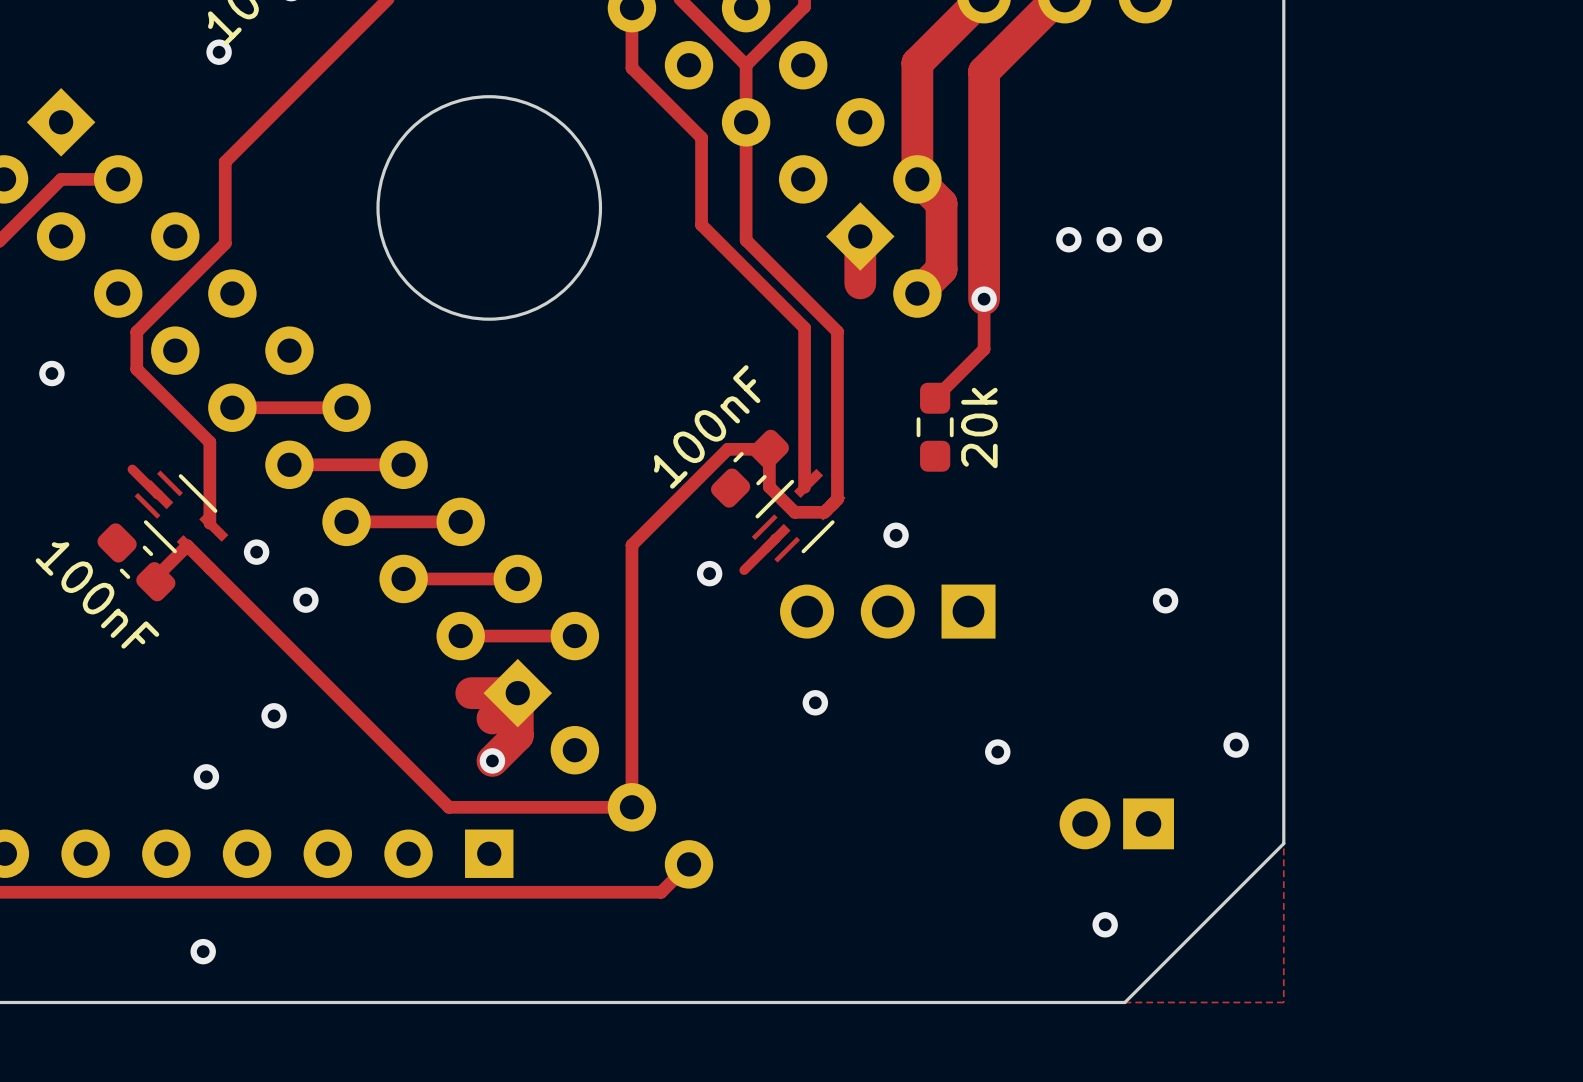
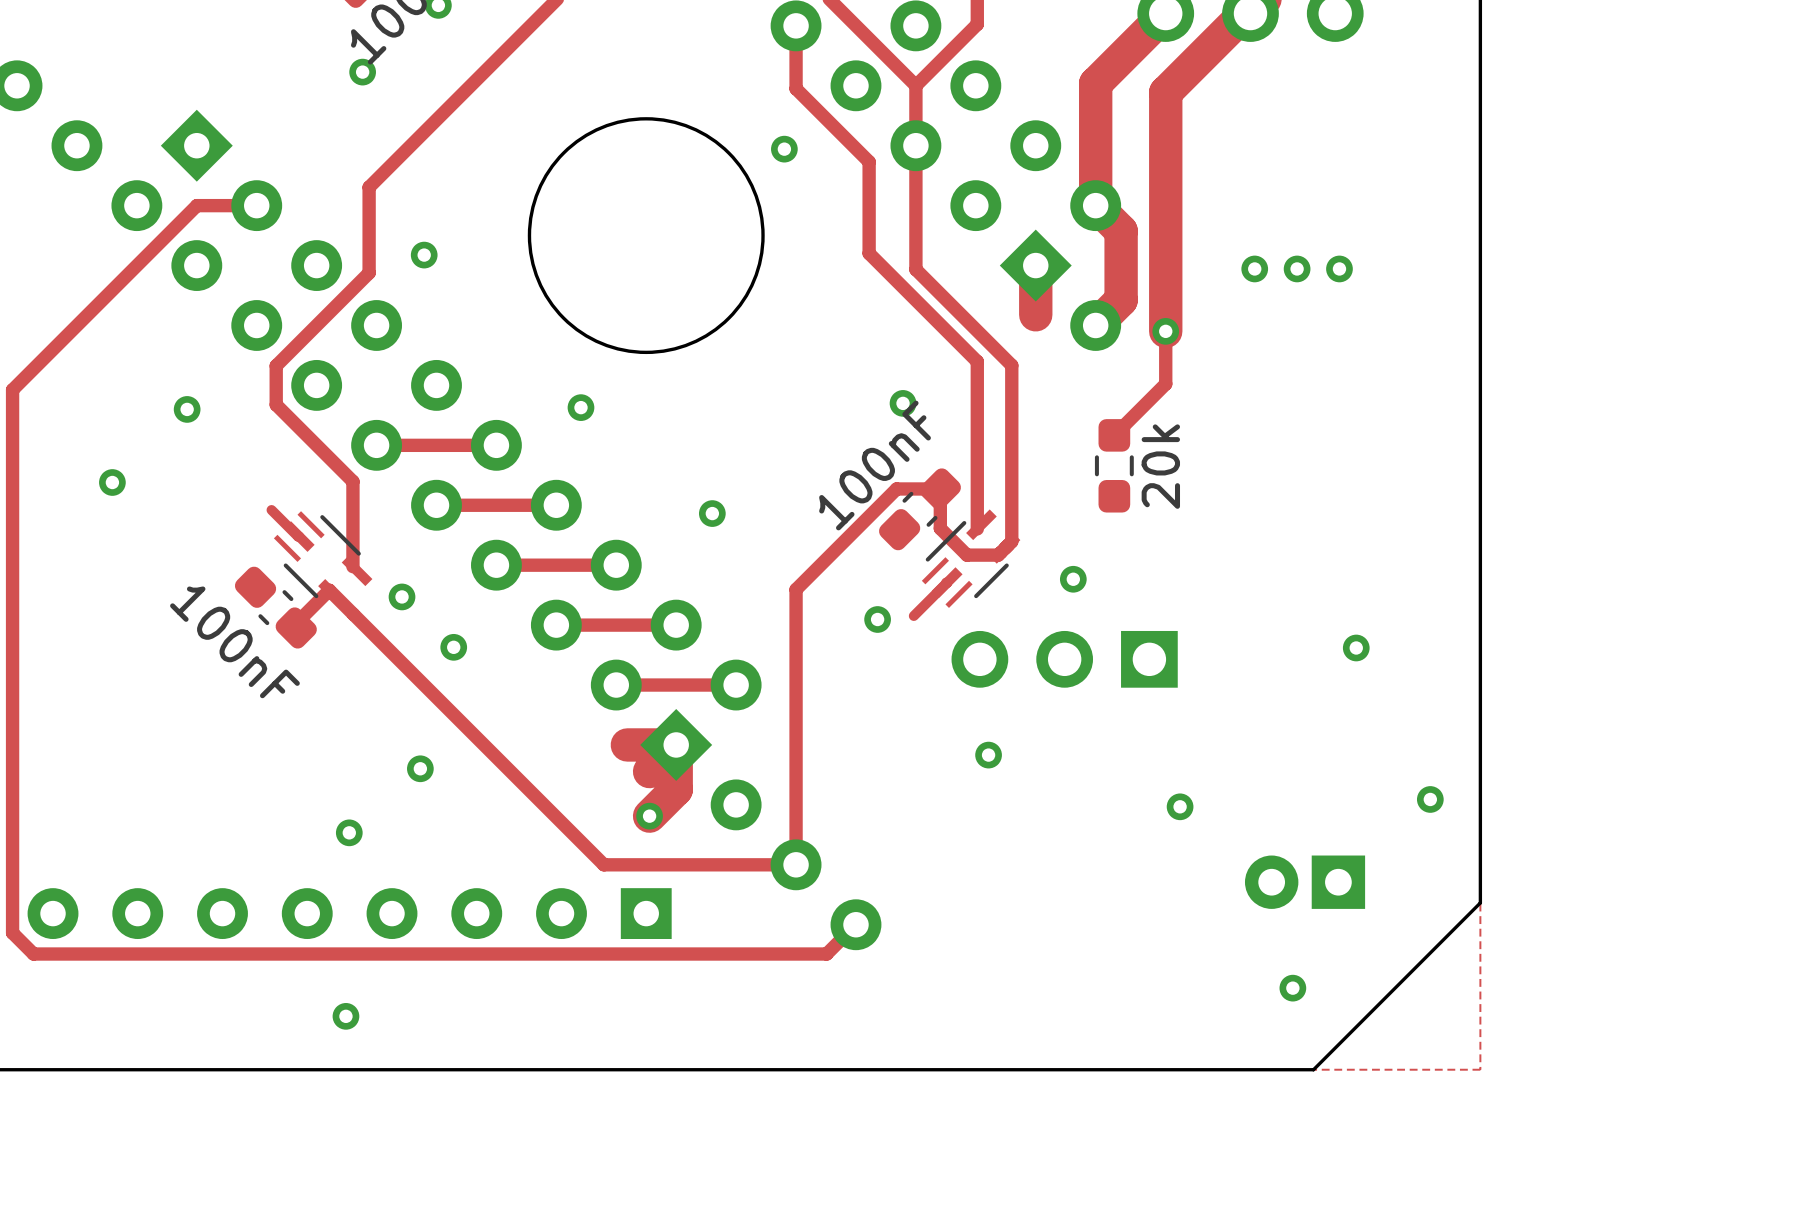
via: none -> (784, 149)
via: none -> (424, 255)
via: none -> (903, 403)
via: none -> (580, 407)
via: none -> (712, 513)

